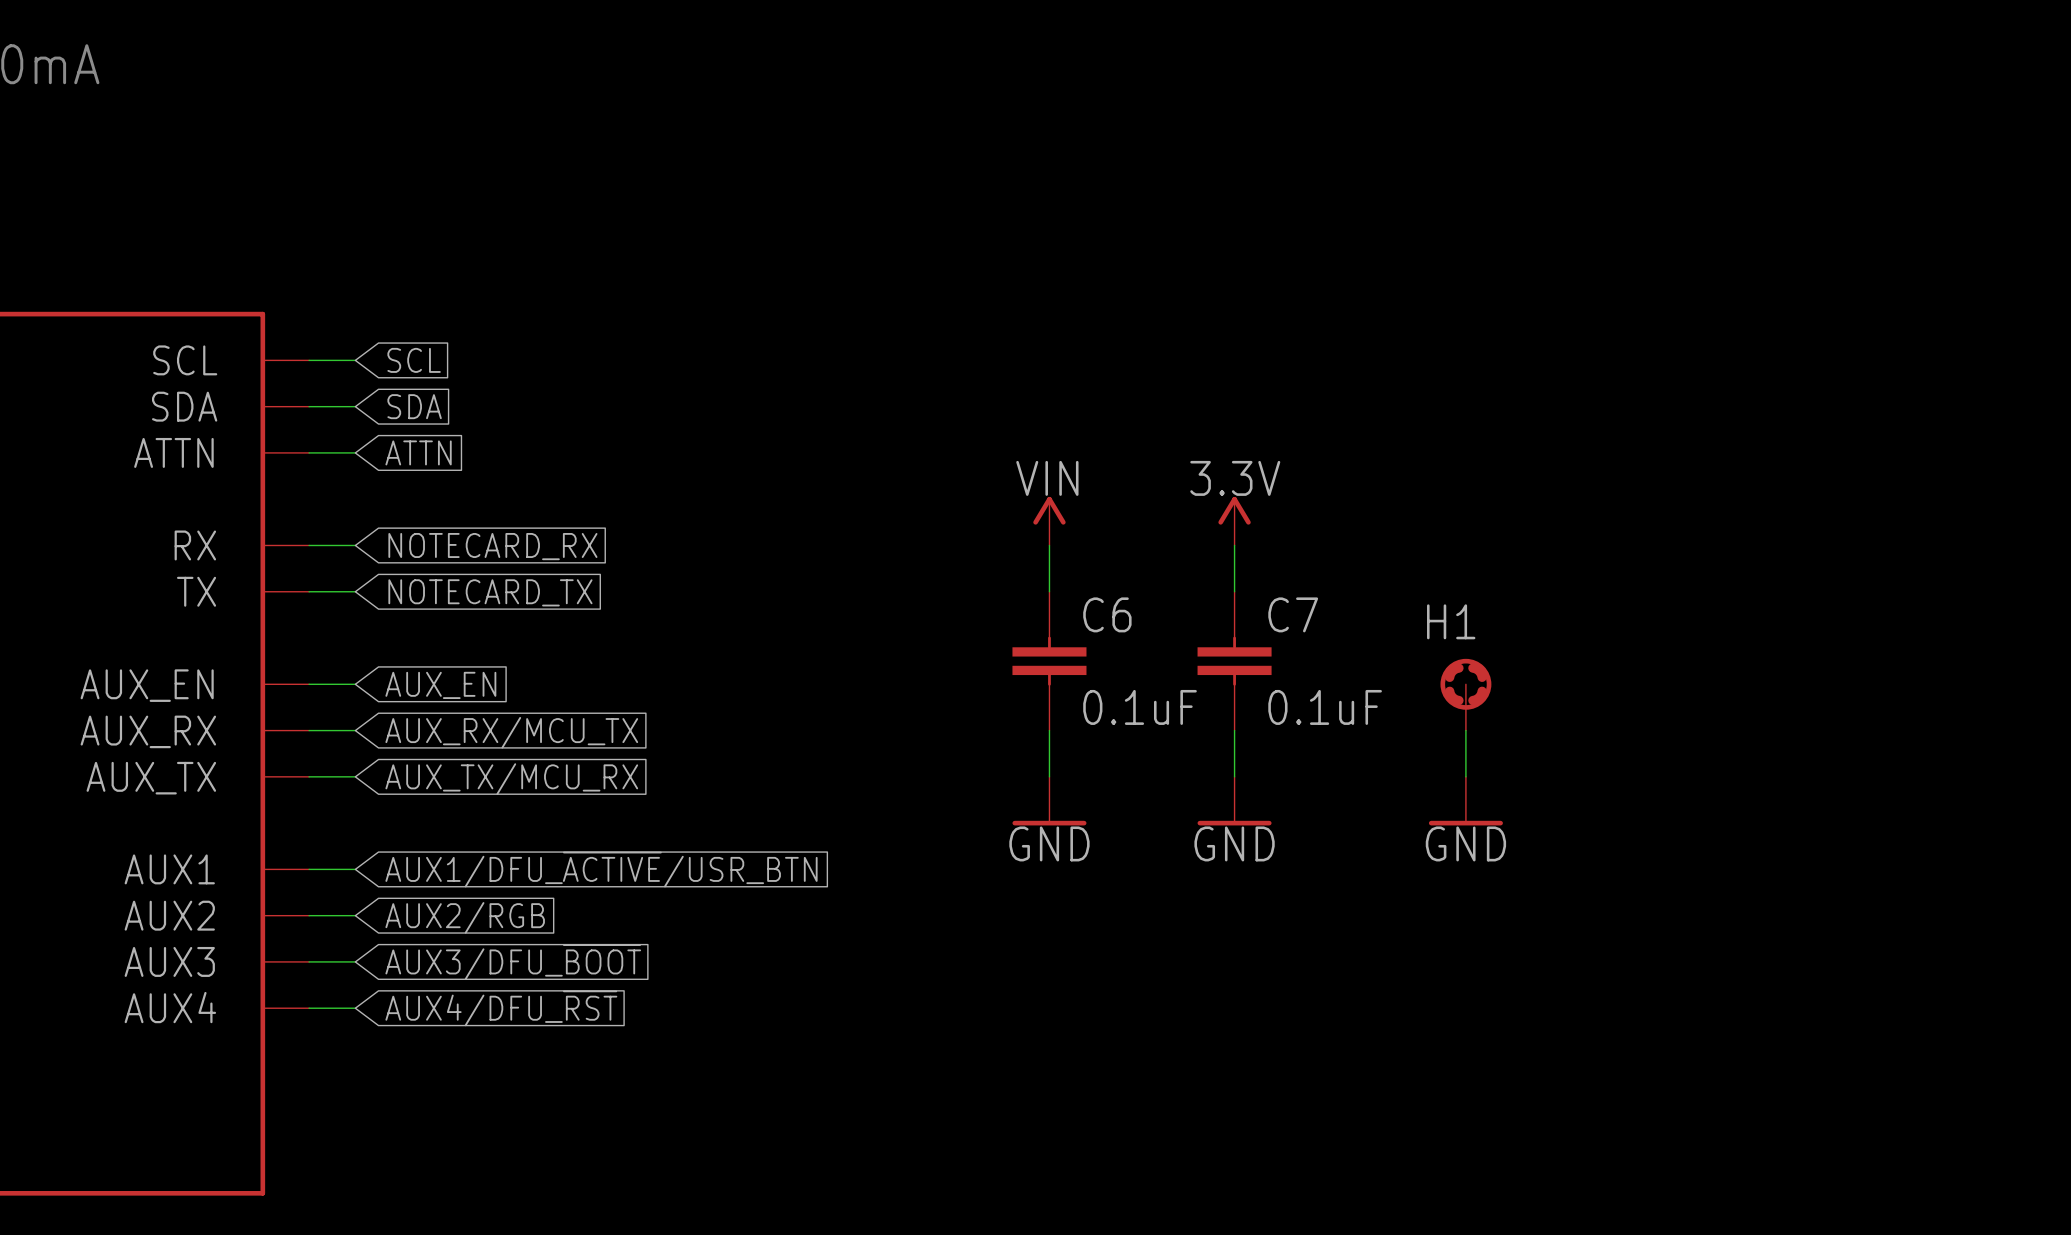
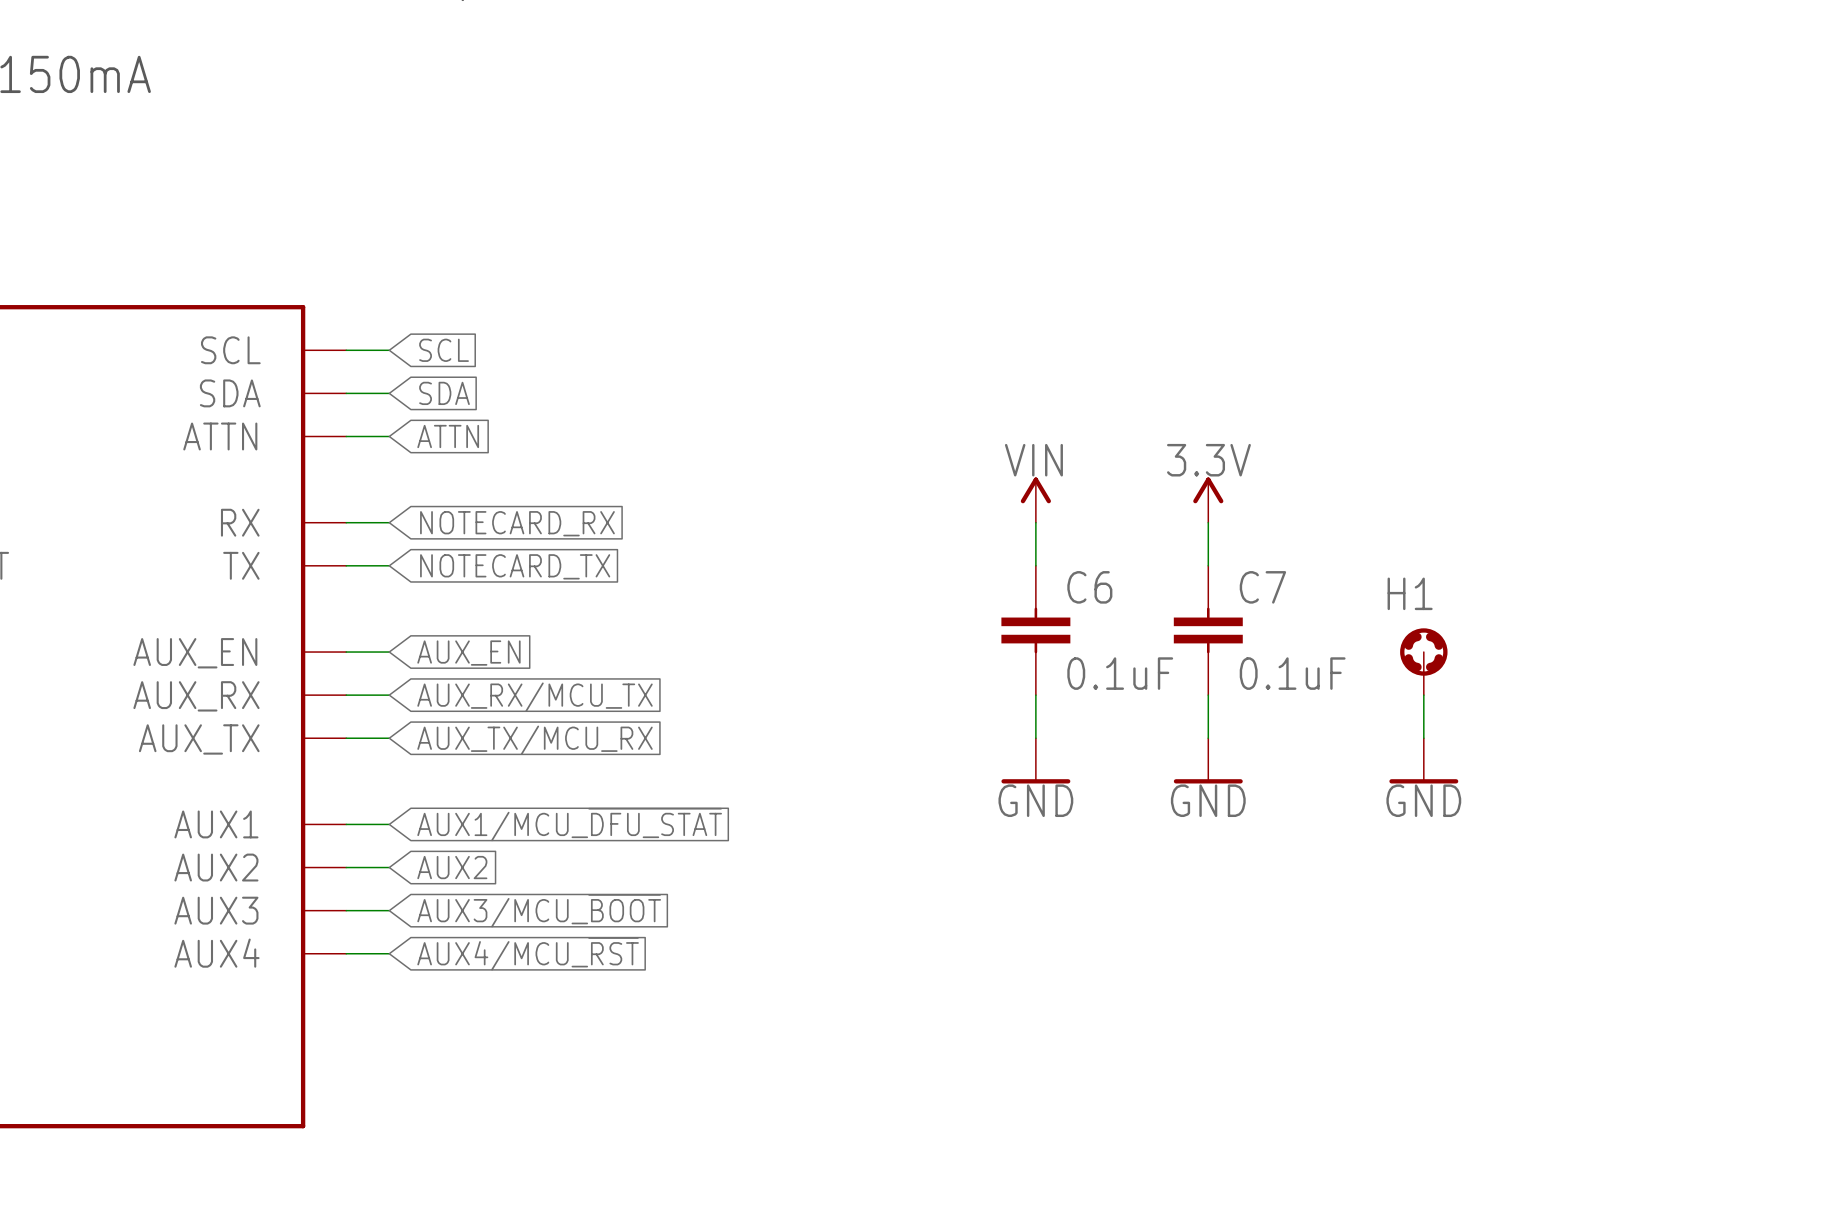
global label: AUX1/DFU_~{ACTIVE}/USR_BTN (601, 869) -> AUX1/MCU_~{DFU_STAT} (569, 824)
global label: AUX2/RGB (465, 917) -> AUX2 (452, 867)
global label: AUX3/DFU_~{BOOT} (513, 962) -> AUX3/MCU_~{BOOT} (539, 910)
global label: AUX4/DFU_~{RST} (501, 1008) -> AUX4/MCU_~{RST} (528, 953)

